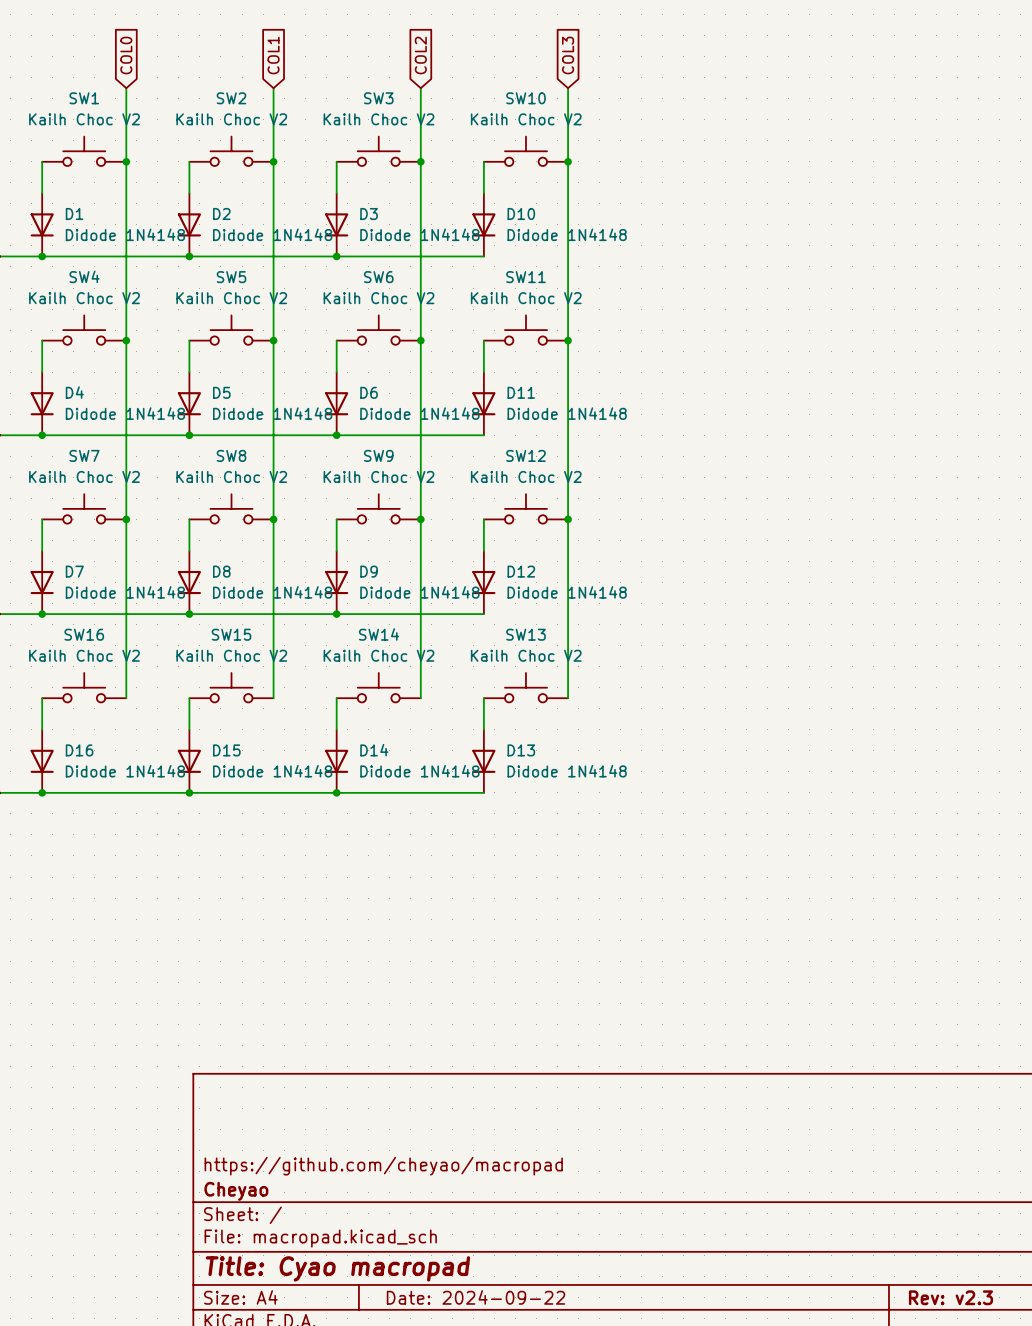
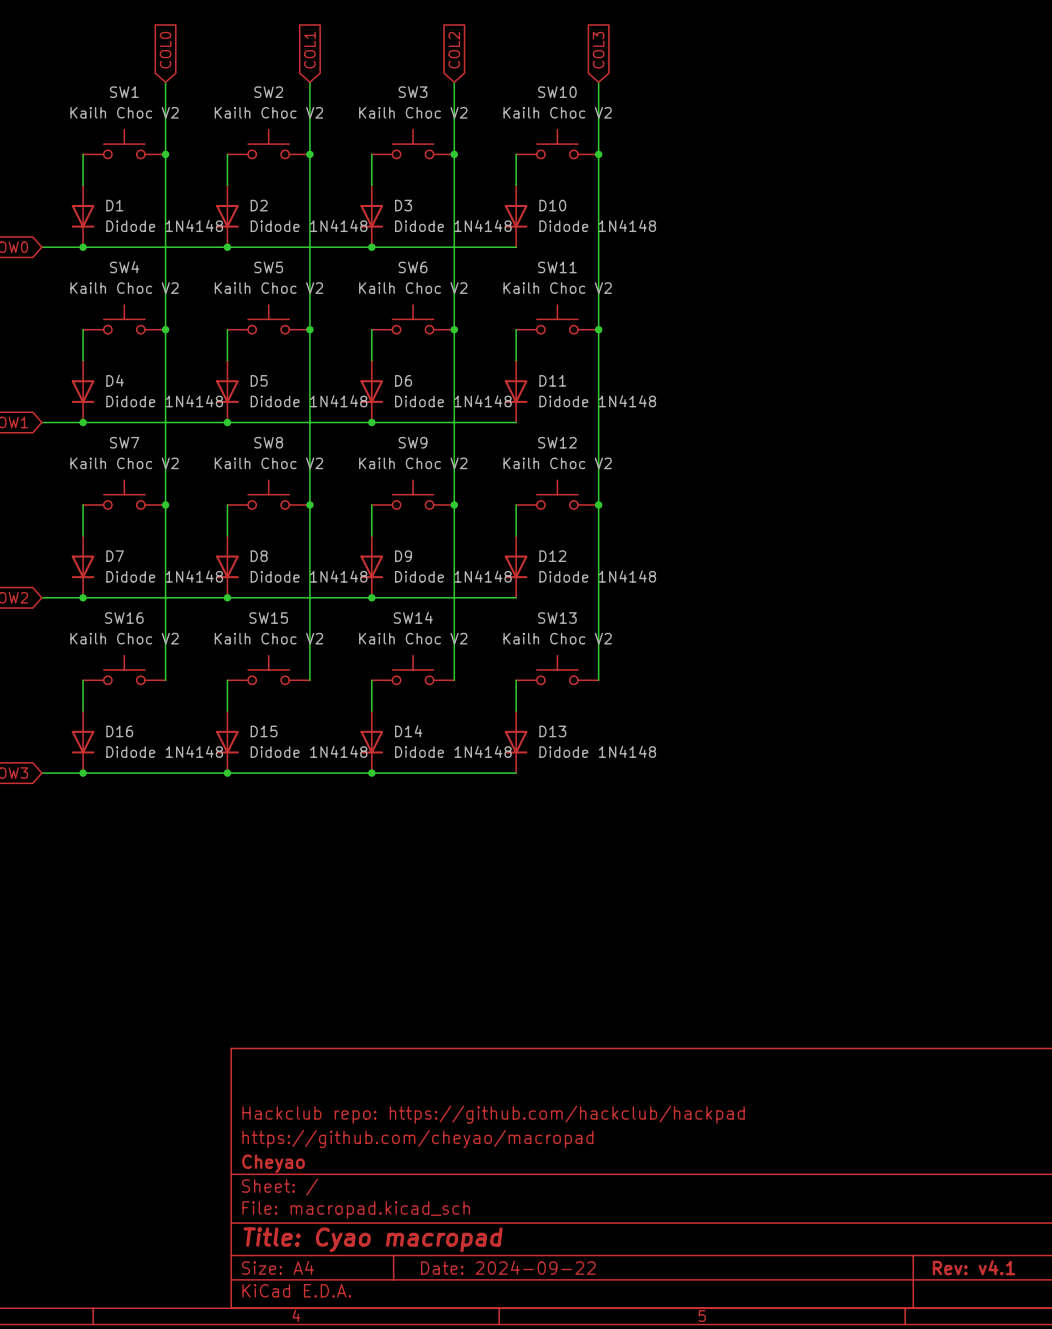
title block: none -> Hackclub repo: https://github.com/hackclub/hackpad (493, 1114)
title block: Rev: v2.3 (950, 1297) -> Rev: v4.1 (974, 1267)

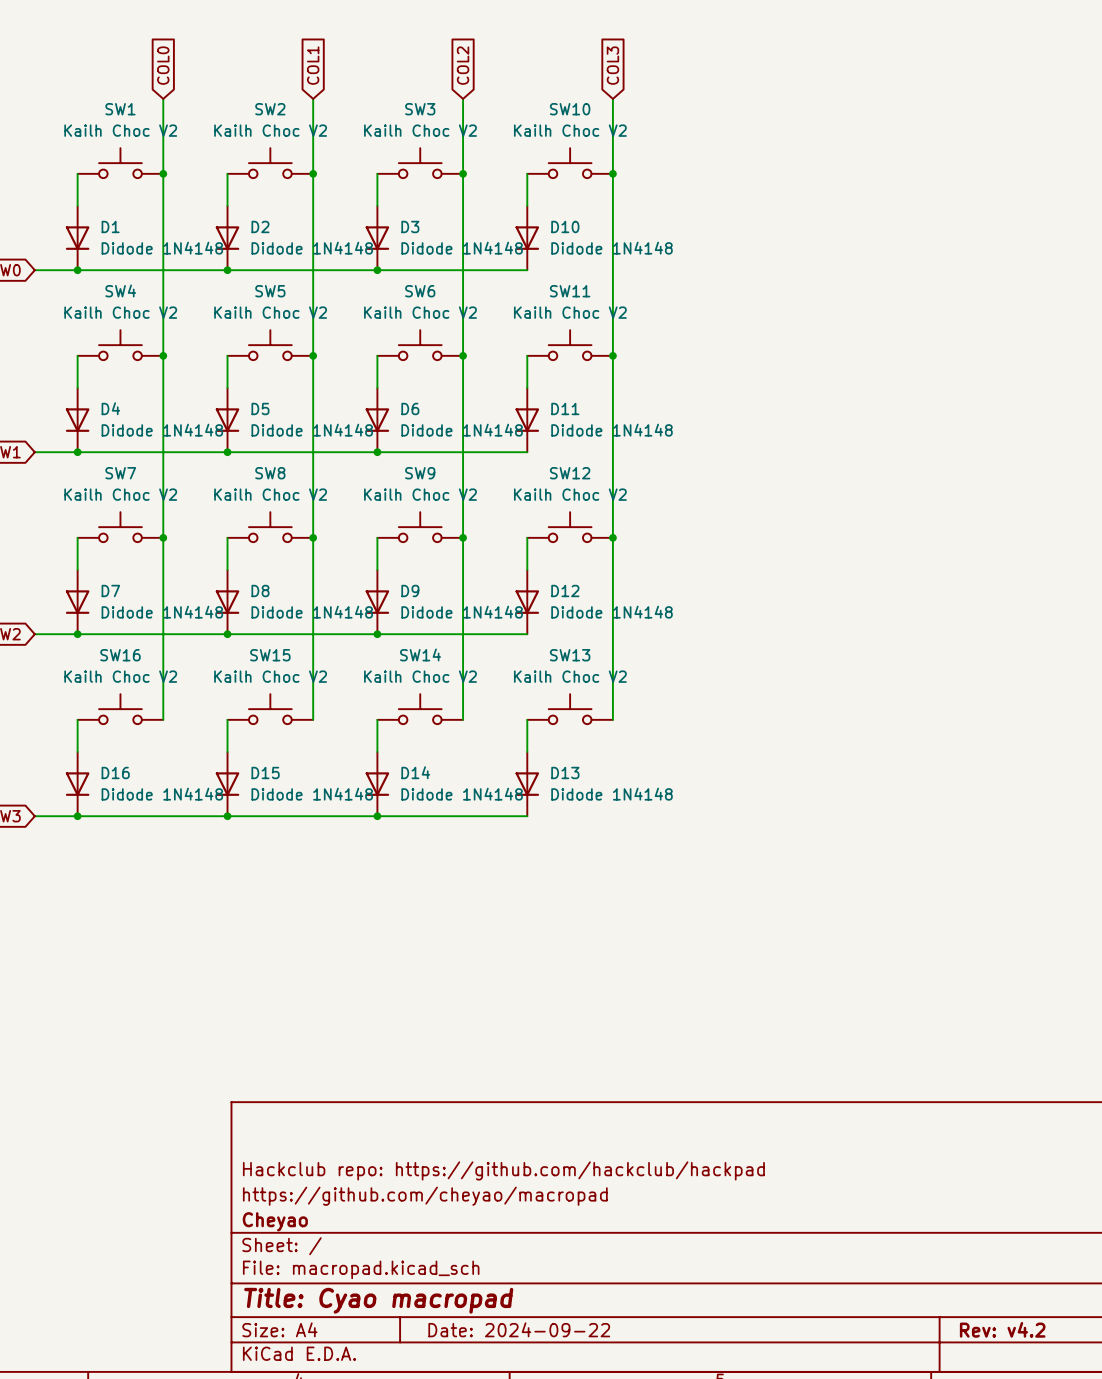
title block: Rev: v4.1 (974, 1267) -> Rev: v4.2 (1002, 1329)

